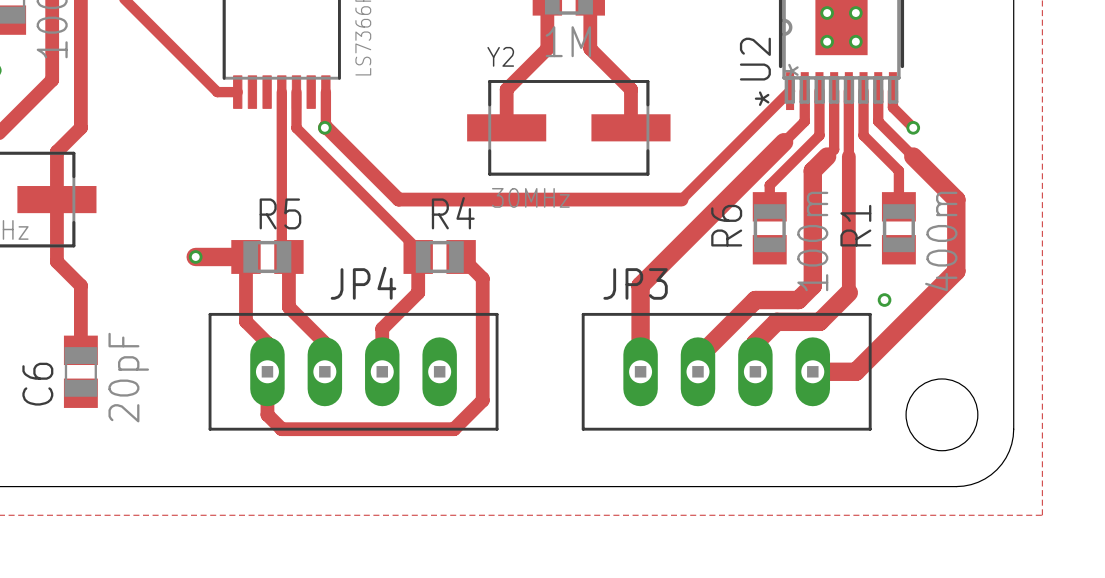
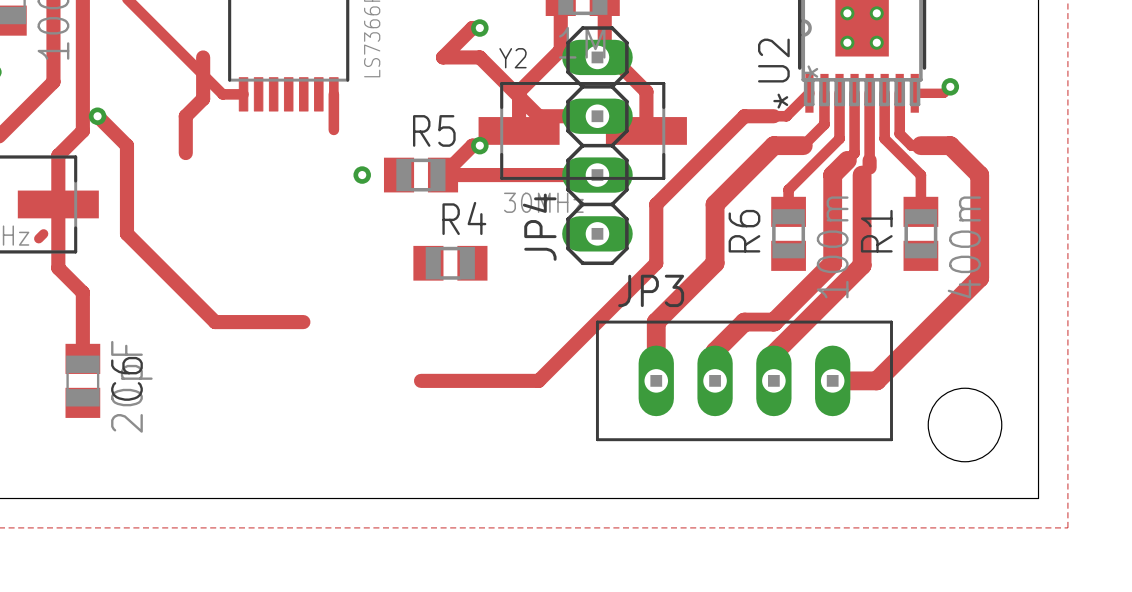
track: none -> (479, 28) (472, 28) (443, 57) (479, 57) (538, 116) (597, 116)
via: none -> (479, 28)
track: none -> (203, 57) (203, 98) (185, 116) (185, 153)
via: none -> (950, 86)
track: (892, 91) (892, 107) (913, 127) -> (914, 93) (943, 93) (950, 86)
track: (281, 92) (281, 249) (288, 256) (288, 307) (324, 343) (324, 371) -> none
track: (296, 92) (296, 128) (418, 249) (418, 292) (382, 328) (382, 371) -> none
track: none -> (97, 116) (126, 145) (126, 233) (215, 322) (303, 322)
via: none -> (97, 116)
track: (767, 113) (681, 199) (398, 199) (324, 127) -> (786, 116) (744, 116) (656, 204) (656, 263) (538, 380) (421, 380)
track: (878, 121) (956, 199) -> (899, 124) (899, 133) (911, 145) (950, 145) (979, 175) (979, 204)
via: (324, 127) -> none
via: (913, 127) -> none
track: none -> (479, 145) (472, 145) (443, 175) (597, 175)
via: none -> (479, 145)
track: (784, 142) (640, 285) (640, 314) -> (803, 145) (773, 145) (715, 204) (715, 263) (656, 322)
track: (848, 163) (848, 292) (819, 321) (776, 321) (755, 345) -> (869, 167) (862, 175) (862, 265) (773, 353)
via: none -> (362, 175)
track: none -> (43, 233) (38, 238)
track: (195, 256) (245, 256) (245, 321) (267, 343) (267, 414) (281, 429) (454, 429) (482, 400) (482, 278) (461, 256) -> none
via: (195, 256) -> none
R5 position: (267, 256) -> (421, 175)
track: (812, 256) (812, 285) (798, 300) (755, 300) (697, 357) -> (832, 263) (773, 322) (744, 322) (715, 351) (715, 366)
JP4 name position: JP4 (363, 283) -> JP4 (539, 227)
via: (884, 300) -> none
JP4 footprint: [208, 312, 499, 431] -> [562, 26, 633, 266]
C6 name position: C6 (37, 384) -> C6 (126, 378)
board edge: (1013, 429) (1009, 451) (996, 469) (978, 482) (956, 486) -> (1038, 439) (1038, 498) (979, 498)

